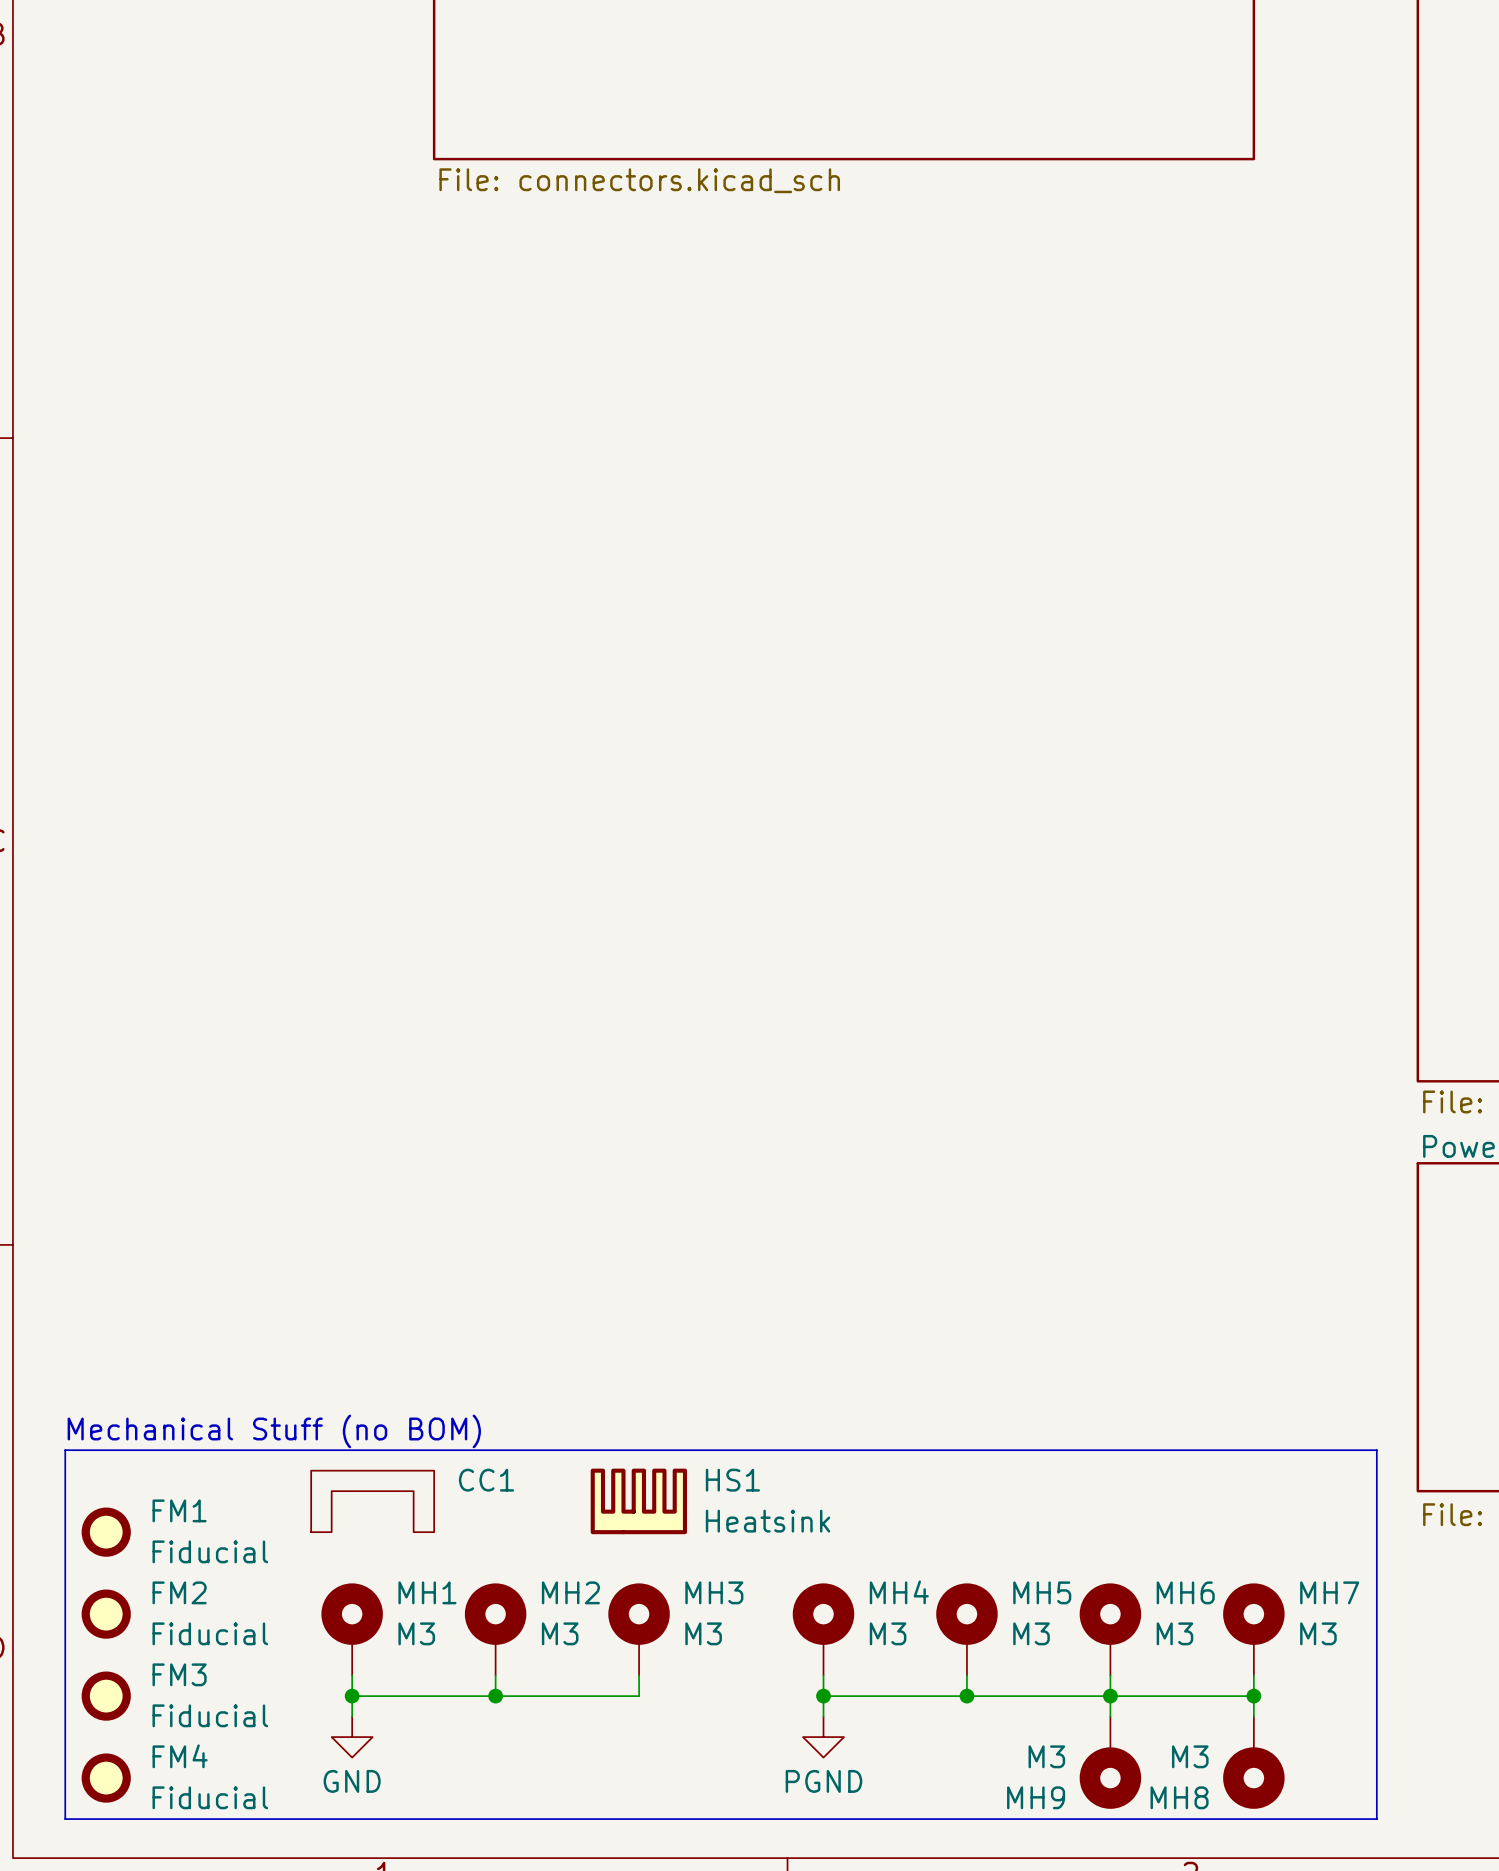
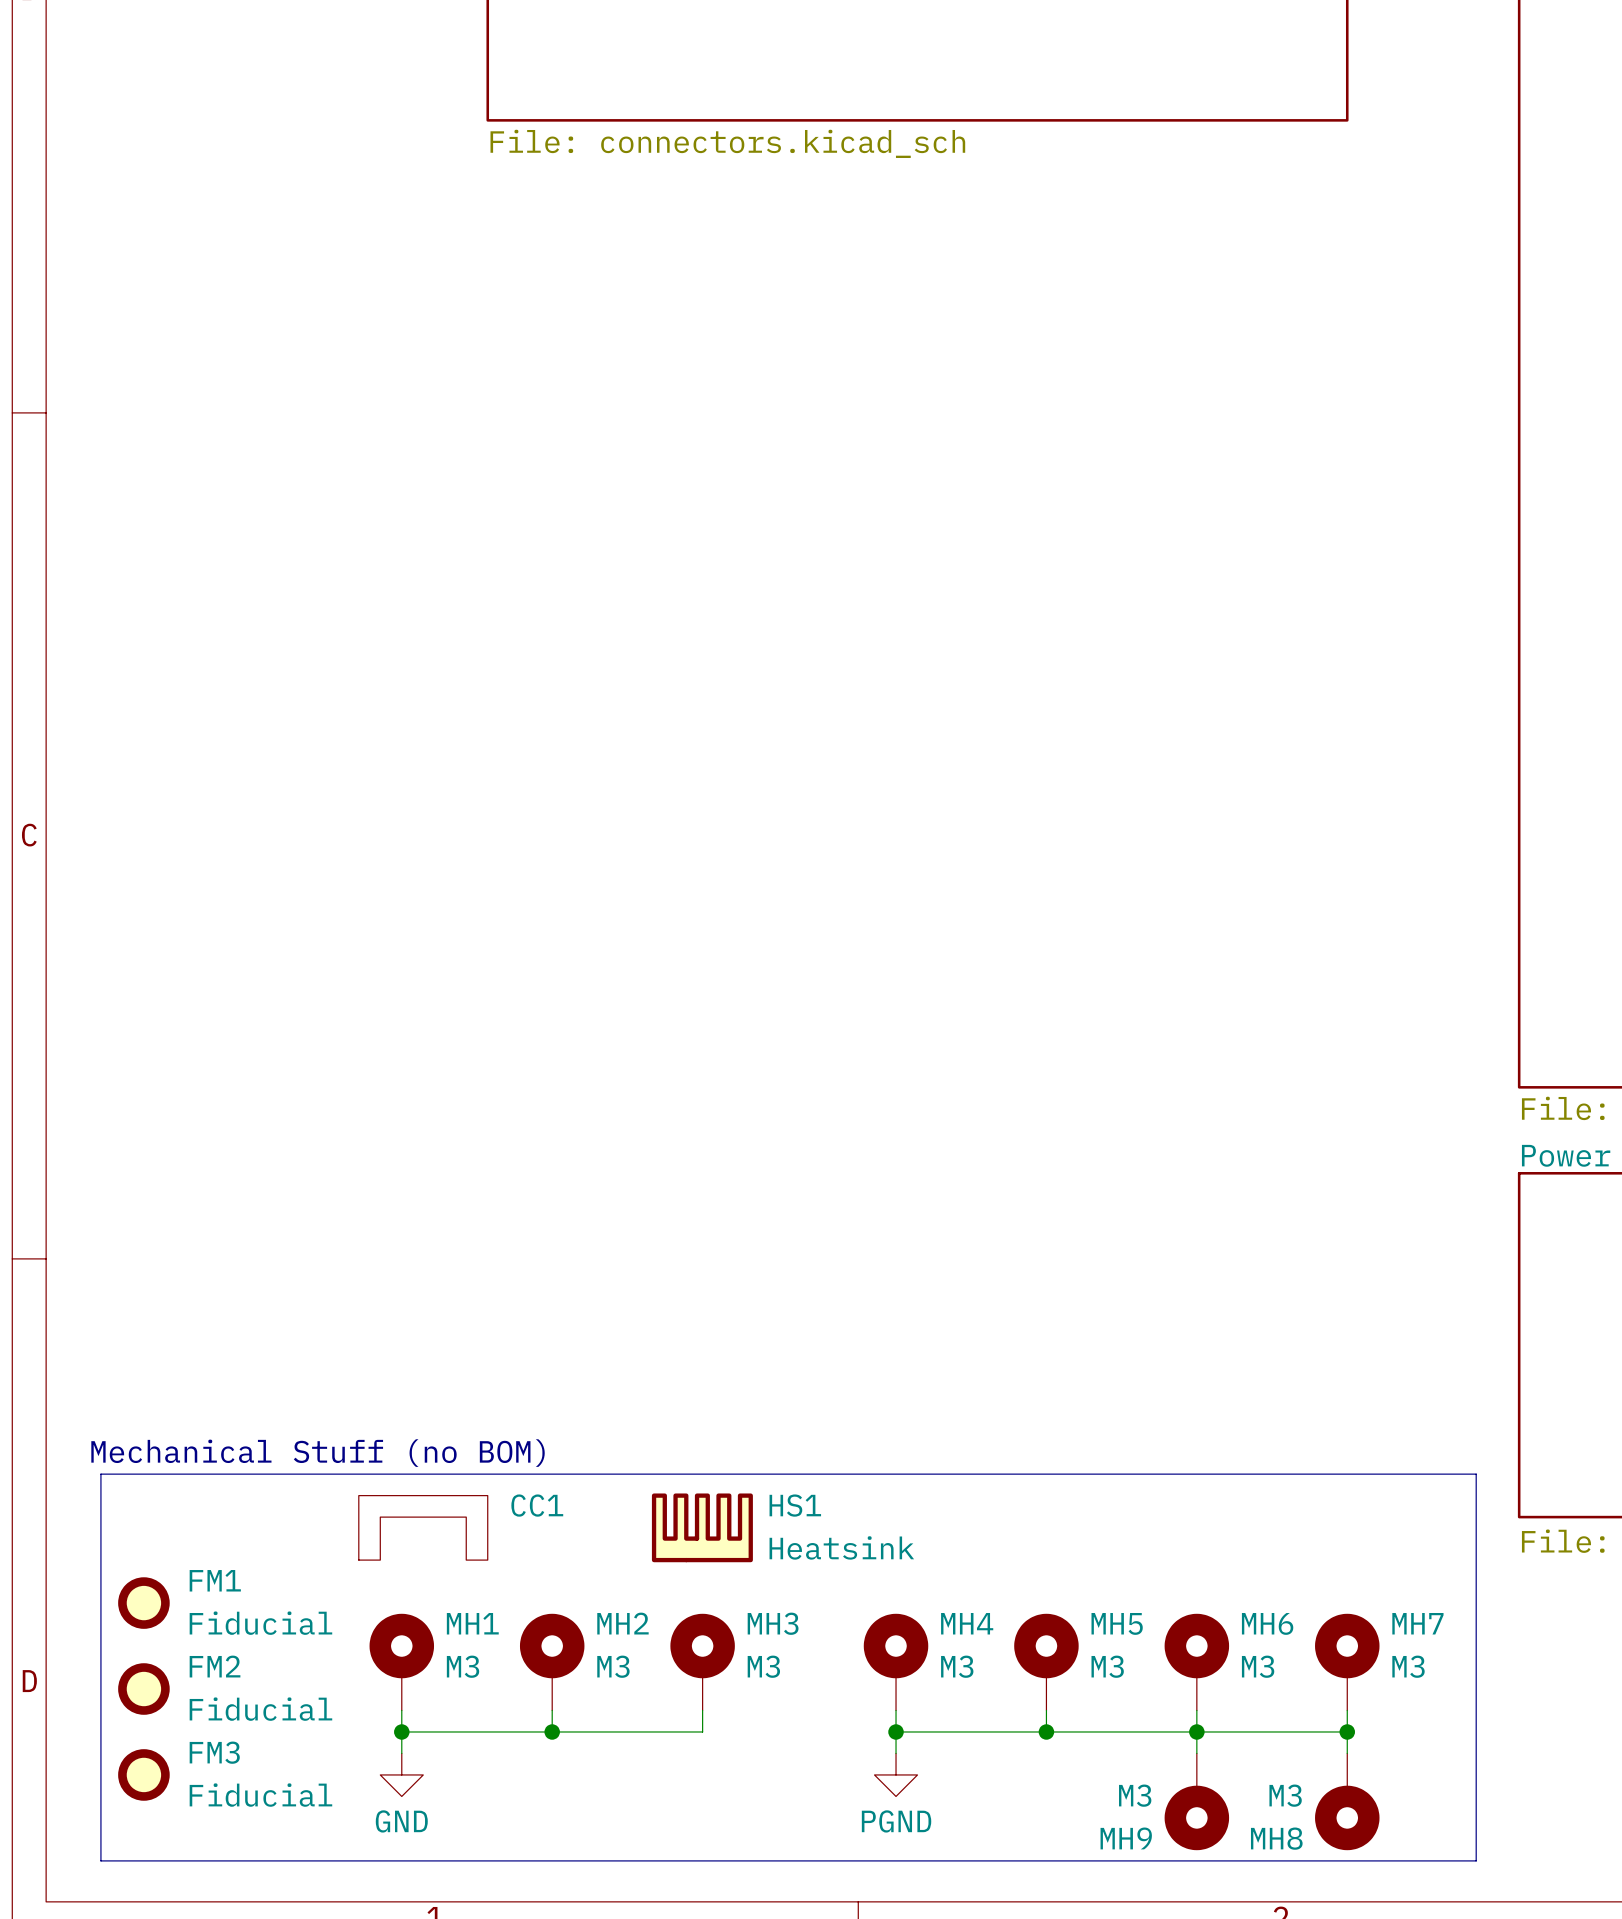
FM1 position: (106, 1532) -> (143, 1603)
FM2 position: (106, 1614) -> (143, 1689)
FM3 position: (106, 1696) -> (143, 1774)
FM4: Fiducial (106, 1778) -> none

